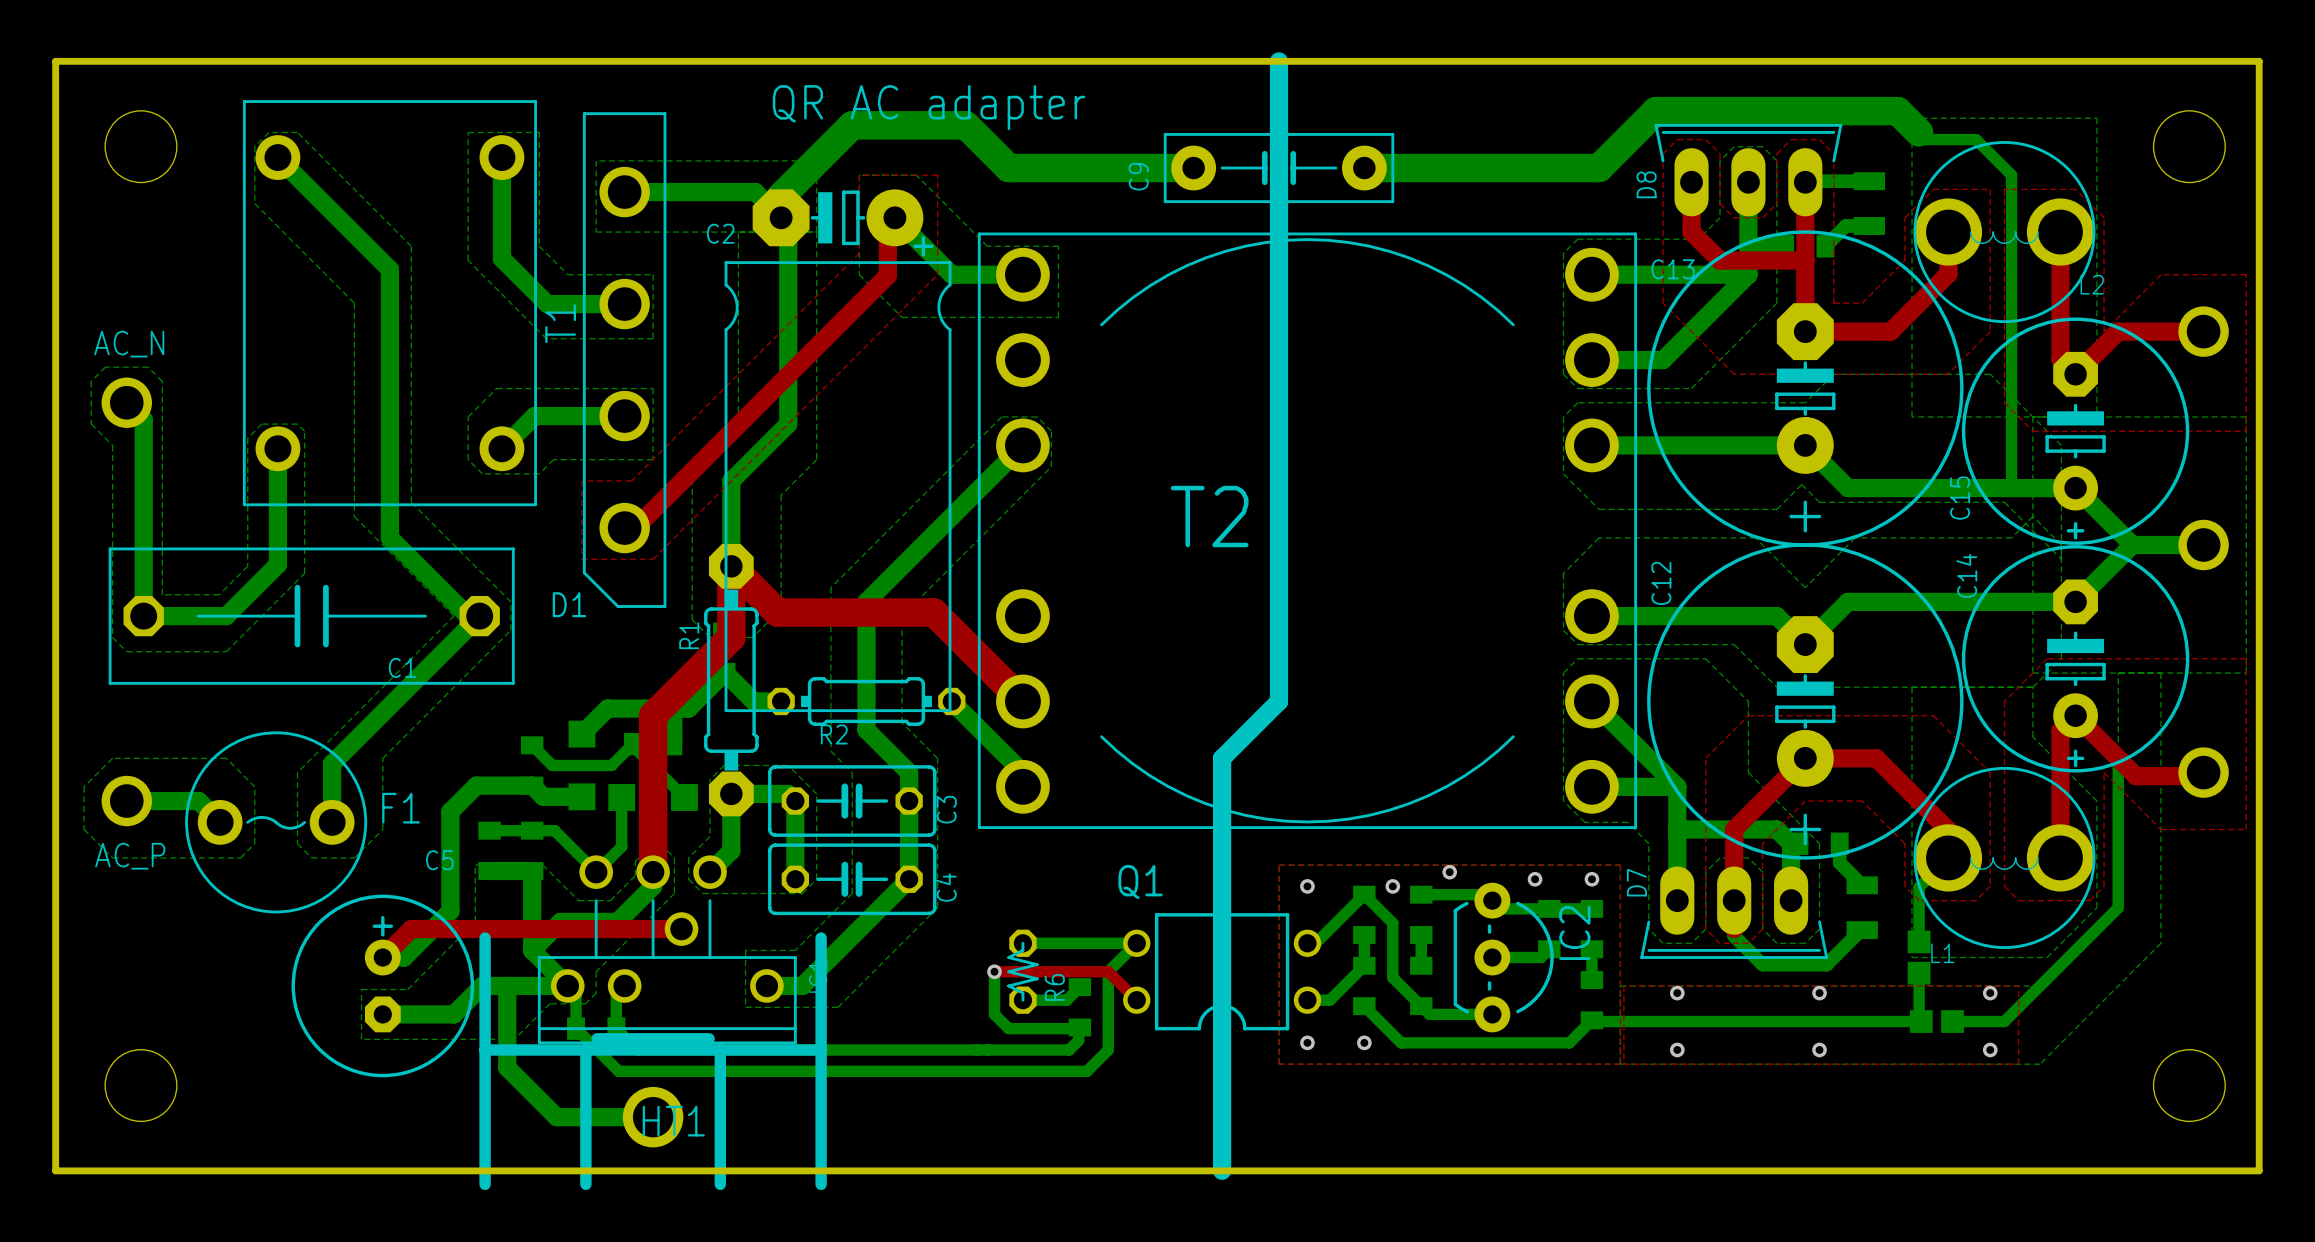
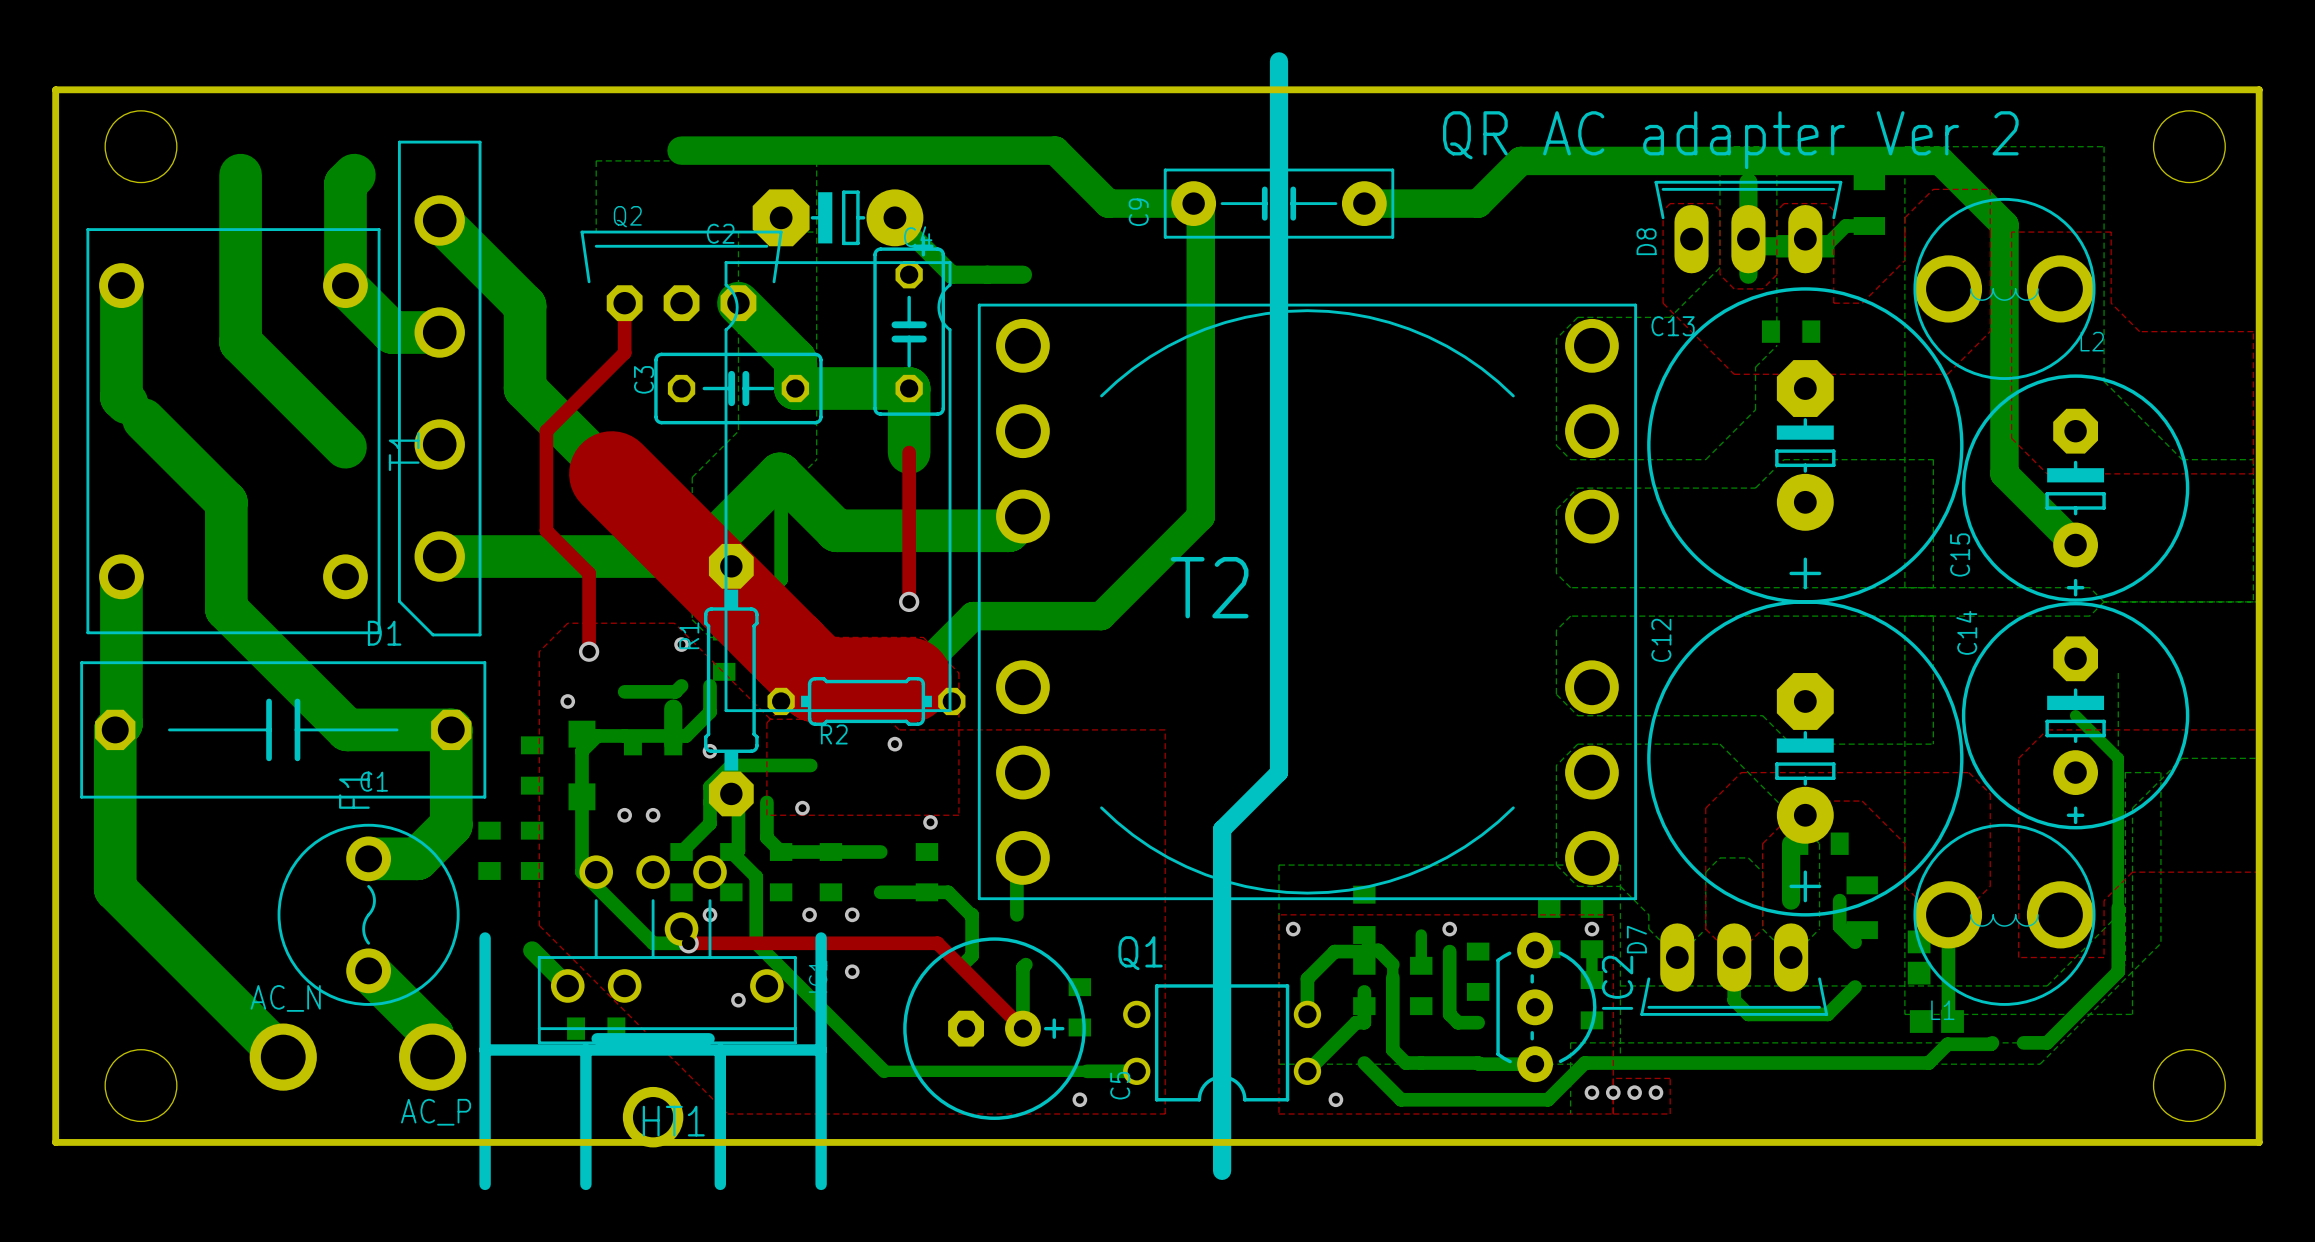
board edge: (55, 89) (55, 61) (2259, 61) (2259, 89) -> (55, 89) (2259, 89)
text: QR AC adapter (929, 107) -> none
bottom zone outline: (269, 132) (297, 132) (411, 246) (411, 502) (510, 601) (510, 630) (382, 758) (382, 829) (354, 857) (311, 857) (297, 843) (297, 772) (453, 616) (354, 516) (354, 303) (254, 203) (254, 146) (269, 132) -> none
bottom zone outline: (468, 132) (539, 132) (539, 246) (567, 274) (653, 274) (653, 338) (546, 338) (468, 260) (468, 132) -> none
text: none -> QR AC adapter Ver 2 (1730, 140)
bottom track: none -> (681, 150) (1055, 150) (1108, 203) (1193, 203) (1200, 210) (1200, 516) (1101, 616) (973, 616) (909, 680)
bottom track: (277, 157) (389, 269) (389, 537) (468, 616) (479, 616) (332, 763) (332, 822) -> none
bottom track: (501, 157) (501, 258) (547, 304) (624, 304) -> none
bottom track: (1193, 168) (1008, 168) (966, 125) (852, 125) (781, 196) (781, 217) -> none
C9 position: (1279, 168) -> (1279, 203)
bottom track: (1364, 168) (1599, 168) (1655, 111) (1897, 111) (1926, 139) (1976, 139) (2011, 175) (2011, 488) -> none
D8 position: (1748, 170) -> (1748, 227)
bottom track: none -> (240, 175) (240, 342) (345, 447)
bottom track: none -> (354, 175) (345, 184) (345, 285) (392, 332) (439, 332)
bottom zone outline: (859, 175) (916, 175) (987, 246) (1058, 246) (1058, 317) (902, 317) (859, 274) (859, 175) -> none
top zone outline: (859, 175) (859, 253) (631, 480) (581, 480) (581, 559) (653, 559) (937, 274) (937, 175) (859, 175) -> none
bottom track: (1869, 181) (1805, 182) -> none
top track: (1691, 182) (1691, 232) (1719, 260) (1805, 260) -> none
top track: (1805, 182) (1805, 331) (1890, 331) (1948, 273) (1948, 232) -> none
top zone outline: (2004, 189) (2075, 189) (2104, 217) (2104, 331) (2160, 274) (2246, 274) (2246, 431) (2032, 431) (2004, 402) (2004, 189) -> (2011, 232) (2011, 438) (2047, 473) (2253, 473) (2253, 331) (2139, 331) (2111, 303) (2111, 232) (2011, 232)
bottom track: (624, 192) (755, 192) (788, 224) (788, 424) (731, 480) (731, 624) (724, 631) -> none
bottom track: none -> (1364, 203) (1478, 203) (1520, 160) (1940, 160) (2004, 224) (2004, 473) (2075, 544)
top zone outline: (1663, 210) (1663, 153) (1677, 139) (1705, 139) (1719, 153) (1719, 203) (1734, 217) (1762, 217) (1776, 203) (1776, 153) (1791, 139) (1819, 139) (1833, 153) (1833, 210) -> (1663, 210) (1670, 203) (1712, 203) (1719, 210) (1719, 274) (1734, 288) (1762, 288) (1776, 274) (1776, 210) (1783, 203) (1826, 203) (1833, 210)
top track: (894, 217) (887, 224) (887, 275) (635, 528) (624, 528) -> none
bottom zone outline: (1719, 217) (1698, 239) (1577, 239) (1563, 253) (1563, 374) (1577, 388) (1691, 388) (1776, 303) -> (1719, 217) (1719, 267) (1670, 317) (1577, 317) (1556, 338) (1556, 445) (1570, 459) (1705, 459) (1755, 409) (1755, 367) (1776, 345) (1776, 303)
bottom track: none -> (439, 220) (525, 305) (525, 388) (611, 473)
L2 position: (2004, 232) -> (2004, 288)
top track: (2060, 232) (2060, 359) (2075, 374) (2118, 331) (2203, 331) -> none
bottom track: (1591, 274) (1748, 274) (1663, 360) (1591, 360) -> none
Q2: none -> (681, 275)
bottom track: none -> (121, 285) (121, 397) (126, 402)
T1 position: (389, 303) -> (233, 431)
top track: none -> (624, 303) (624, 352) (546, 431) (546, 530) (589, 573) (589, 651)
bottom track: none -> (738, 303) (795, 360) (795, 388) (909, 388) (909, 452)
part: none -> (1791, 331)
part: (2203, 331) -> none
D1 position: (624, 360) -> (439, 388)
bottom zone outline: (105, 367) (148, 367) (162, 381) (162, 594) (219, 594) (247, 566) (247, 438) (261, 424) (297, 424) (304, 431) (304, 573) (226, 651) (126, 651) (112, 637) (112, 445) (91, 424) (91, 381) (105, 367) -> none
bottom zone outline: (496, 388) (653, 388) (653, 459) (553, 459) (539, 473) (482, 473) (468, 459) (468, 416) (496, 388) -> none
C13 position: (1805, 388) -> (1805, 445)
part: AC_N (126, 402) -> none
bottom track: (624, 416) (534, 416) (501, 448) -> none
bottom zone outline: (1001, 416) (1037, 416) (1051, 431) (1051, 466) (902, 616) (902, 722) (937, 758) (937, 907) (838, 1007) (745, 1007) (745, 950) (795, 950) (852, 893) (852, 772) (830, 751) (830, 587) (1001, 416) -> none
bottom zone outline: (2032, 416) (2032, 673) (2246, 673) (2246, 416) (1912, 416) (1912, 118) (2096, 118) (2096, 416) -> none
bottom track: (143, 419) (143, 616) (226, 616) (277, 564) (277, 448) -> (143, 419) (226, 502) (226, 609) (347, 729) (451, 729) (451, 825) (417, 858) (368, 858)
C15 position: (2075, 431) -> (2075, 488)
bottom track: (1022, 445) (866, 601) (866, 729) (909, 772) (909, 879) (802, 985) (766, 985) -> none
bottom track: (1591, 445) (1805, 445) (1848, 488) (2075, 488) (2132, 544) -> none
top track: none -> (909, 452) (909, 601)
top track: none -> (611, 473) (818, 680) (909, 680)
bottom track: none -> (779, 473) (697, 556) (439, 556)
bottom track: none -> (779, 473) (836, 530) (1008, 530) (1022, 516)
bottom track: none -> (779, 473) (781, 579) (774, 586) (766, 586)
T2 position: (1307, 530) -> (1307, 601)
bottom zone outline: (2061, 544) (2032, 516) (2011, 537) (1855, 537) (1805, 587) (1755, 537) (1599, 537) (1563, 573) (1563, 630) (1577, 644) (1734, 644) (1776, 687) (2032, 687) -> none
bottom track: (2132, 544) (2203, 544) -> none
bottom track: (2132, 544) (2075, 601) (1848, 601) (1805, 644) (1776, 616) (1591, 616) -> none
part: (2203, 544) -> none
bottom zone outline: (2061, 559) (2004, 502) (1819, 502) (1801, 484) (1776, 509) (1599, 509) (1563, 473) (1563, 416) (1577, 402) (1805, 402) (1833, 374) (1990, 374) (2061, 445) (2061, 658) (2032, 687) -> none
bottom track: none -> (121, 576) (121, 723) (115, 729) (115, 889) (283, 1057)
bottom zone outline: none -> (1904, 587) (1904, 146) (2104, 146) (2104, 381) (2182, 459) (2253, 459) (2253, 601)
bottom zone outline: none -> (1933, 587) (1933, 459) (1783, 459) (1755, 488) (1577, 488) (1556, 509) (1556, 573) (1570, 587) (2089, 587) (2104, 601)
via: none -> (909, 601)
bottom zone outline: none -> (2104, 601) (2260, 601) (2260, 758) (2182, 758) (2132, 808) (2132, 1014) (1904, 1014) (1904, 616)
bottom zone outline: none -> (2104, 601) (2089, 616) (1570, 616) (1556, 630) (1556, 694) (1577, 715) (1762, 715) (1791, 744) (1933, 744) (1933, 616)
C1 position: (311, 616) -> (283, 729)
top zone outline: none -> (567, 623) (674, 623) (770, 719) (888, 719) (899, 729) (1165, 729) (1165, 1113) (727, 1113) (539, 925) (539, 651) (567, 623)
top zone outline: none -> (823, 637) (795, 665) (795, 694) (766, 722) (766, 815) (958, 815) (958, 673) (923, 637) (823, 637)
via: none -> (681, 644)
via: none -> (589, 651)
top zone outline: (2047, 658) (2246, 658) (2246, 829) (2160, 829) (2104, 772) (2104, 886) (2089, 900) (2018, 900) (2004, 886) (2004, 701) (2047, 658) -> (2047, 729) (2018, 758) (2018, 957) (2104, 957) (2104, 900) (2132, 872) (2260, 872) (2260, 729) (2047, 729)
C14 position: (2075, 658) -> (2075, 715)
bottom zone outline: (2160, 673) (2160, 772) -> (1570, 1113) (1570, 1042) (2047, 1042) (2125, 964) (2125, 772) (2160, 772)
bottom track: none -> (681, 685) (675, 691) (624, 691)
bottom track: none -> (710, 685) (710, 712) (686, 735) (597, 735) (581, 751) (581, 872) (653, 943) (688, 943)
bottom zone outline: (1912, 687) (1912, 957) (2047, 957) (2096, 907) (2096, 801) (2032, 737) (2032, 687) -> none
via: none -> (567, 701)
bottom track: (781, 701) (753, 701) (724, 671) (688, 708) (607, 708) (581, 734) -> none
bottom track: (951, 701) (1022, 772) (1022, 786) -> none
top track: (1022, 701) (934, 612) (777, 612) (731, 566) (731, 637) (653, 715) (653, 872) -> none
line: (1279, 701) (1222, 758) (1222, 829) -> (1279, 701) (1279, 772) (1222, 829)
bottom track: (1591, 701) (1677, 786) -> none
C12 position: (1805, 701) -> (1805, 758)
via: none -> (894, 744)
bottom track: (532, 745) (552, 765) (611, 765) (632, 744) (684, 797) -> none
via: none -> (710, 751)
bottom zone outline: (112, 758) (226, 758) (254, 786) (254, 843) (240, 857) (112, 857) (84, 829) (84, 786) (112, 758) -> none
bottom zone outline: (724, 765) (788, 765) (816, 793) (816, 879) (802, 893) (702, 893) (688, 879) (688, 857) (710, 836) (710, 779) (724, 765) -> none
bottom track: none -> (810, 765) (731, 765) (710, 786) (710, 823) (681, 852)
bottom zone outline: (1748, 772) (1748, 701) (1705, 658) (1577, 658) (1563, 673) (1563, 801) (1584, 822) (1627, 822) (1648, 843) (1648, 914) -> (1748, 772) (1719, 744) (1577, 744) (1556, 765) (1556, 865) (1577, 886) (1620, 886) (1648, 914)
top track: (2203, 772) (2200, 776) (2136, 776) (2075, 715) (2060, 730) (2060, 857) -> none
part: (2203, 772) -> none
bottom track: (1591, 786) (1677, 786) -> none
bottom track: (1677, 786) (1677, 900) -> none
top zone outline: (1990, 793) (1990, 772) (1933, 715) (1748, 715) (1705, 758) (1705, 808) -> (1990, 793) (1968, 772) (1741, 772) (1705, 808)
bottom track: (581, 796) (543, 796) (532, 785) (476, 785) (450, 811) (450, 911) (404, 957) (382, 957) -> none
bottom track: (621, 797) (621, 846) (596, 872) (554, 830) (489, 830) -> none
part: (653, 797) -> none
bottom track: (126, 801) (198, 801) (220, 822) -> none
part: AC_P (126, 801) -> none
C3 rotation: 0° (852, 801) -> 180° (738, 388)
C3 position: (852, 801) -> (738, 388)
bottom track: none -> (766, 802) (766, 837) (781, 852) (880, 852)
via: none -> (802, 808)
via: none -> (624, 815)
via: none -> (653, 815)
F1 rotation: 0° (276, 822) -> 90° counterclockwise (368, 914)
F1 position: (276, 822) -> (368, 914)
via: none -> (930, 822)
bottom track: (1677, 829) (1776, 829) (1791, 843) (1799, 843) -> none
bottom track: (1839, 843) (1839, 862) (1862, 885) -> none
bottom zone outline: (645, 850) (635, 861) (635, 875) (610, 900) (578, 900) (542, 865) (475, 865) (475, 921) (407, 989) (361, 989) (361, 1039) (514, 1039) (549, 1003) (585, 1003) (596, 993) (596, 971) (674, 893) (674, 857) (667, 850) (645, 850) -> none
bottom track: none -> (1022, 857) (1016, 863) (1016, 914)
bottom track: (1948, 857) (1919, 887) (1919, 941) -> none
top track: (1948, 857) (1948, 830) (1876, 758) (1805, 758) (1734, 829) (1734, 929) -> none
L1 position: (2004, 857) -> (2004, 914)
bottom track: (489, 870) (532, 870) (532, 950) (560, 921) (617, 921) (653, 886) (653, 872) -> none
part: none -> (681, 872)
bottom track: (710, 872) (731, 850) (731, 793) (788, 793) (795, 801) (795, 879) -> none
part: none -> (731, 872)
part: none -> (781, 872)
part: none -> (830, 872)
part: none -> (926, 872)
via: (1449, 872) -> none
C4 rotation: 0° (852, 879) -> 90° counterclockwise (909, 331)
C4 position: (852, 879) -> (909, 331)
via: (1535, 879) -> none
via: (1591, 879) -> none
via position: (1307, 886) -> (1293, 929)
via: (1392, 886) -> none
bottom track: none -> (880, 892) (948, 892) (972, 914) (972, 955) (963, 964)
bottom track: (1421, 894) (1486, 894) (1500, 908) (1591, 908) -> none
bottom track: (1734, 900) (1734, 936) (1762, 964) (1826, 964) (1862, 930) -> none
bottom track: none -> (1839, 900) (1839, 926) (1855, 942)
bottom track: (2118, 907) (2004, 1021) (1952, 1021) -> (2118, 907) (2118, 971) (2047, 1042) (2023, 1042)
D7 position: (1734, 912) -> (1734, 969)
via: none -> (710, 914)
via: none -> (809, 914)
via: none -> (852, 914)
top zone outline: (1279, 914) (1279, 865) (1620, 865) (1620, 1064) (1279, 1064) -> (1279, 914) (1613, 914) (1613, 1113)
part position: (1421, 914) -> (1478, 971)
bottom track: none -> (1948, 914) (1947, 1013)
top track: (681, 929) (411, 929) (382, 957) -> none
via: none -> (1449, 929)
via: none -> (1591, 929)
bottom track: (1364, 935) (1364, 965) (1329, 1000) (1307, 1000) -> none
top track: none -> (688, 943) (937, 943) (1022, 1028)
via: none -> (688, 943)
bottom track: (1022, 943) (1136, 943) (1108, 971) (1108, 1049) (1086, 1071) -> (1136, 1071) (1086, 1071)
bottom track: (1307, 943) (1315, 943) (1364, 894) (1392, 923) (1392, 964) -> (1307, 1014) (1307, 978) (1334, 951) (1378, 950) (1392, 964)
bottom track: (1549, 949) (1540, 957) (1492, 957) -> none
bottom track: none -> (1449, 951) (1449, 1014) (1457, 1022) (1478, 1022)
IC2 position: (1503, 957) -> (1546, 1007)
bottom track: none -> (1734, 957) (1734, 1000) (1748, 1014) (1827, 1014) (1855, 987)
bottom track: none -> (1025, 964) (1022, 967) (1022, 1028)
bottom track: none -> (368, 970) (432, 1034) (432, 1057)
via: none -> (852, 971)
bottom track: (994, 971) (994, 1014) (1008, 1028) (1078, 1028) -> none
top track: (994, 971) (1108, 971) (1136, 1000) -> none
via: (994, 971) -> none
R6: (1022, 971) -> none
Q1 position: (1222, 971) -> (1222, 1042)
bottom track: (1919, 973) (1919, 1019) (1921, 1021) (1591, 1020) (1569, 1042) (1401, 1042) (1364, 1006) -> none
bottom track: (1392, 977) (1429, 1014) (1492, 1014) -> (1392, 977) (1392, 1049) (1405, 1063) (1535, 1064)
C5 rotation: 0° (382, 985) -> 90° clockwise (994, 1028)
C5 position: (382, 985) -> (994, 1028)
bottom track: (507, 985) (507, 1067) (556, 1117) (653, 1117) -> none
bottom track: (624, 985) (616, 992) (616, 1028) (637, 1049) (1069, 1049) (1078, 1040) (1078, 1028) -> none
top zone outline: (1623, 985) (1623, 1064) (2018, 1064) (2018, 985) (1623, 985) -> none
bottom track: (1079, 987) (1066, 1000) (1022, 1000) -> none
bottom track: none -> (1364, 991) (1364, 1022) (1356, 1022) (1307, 1071)
via: (1677, 993) -> none
via: (1819, 993) -> none
via: (1990, 993) -> none
via: none -> (738, 1000)
bottom track: (382, 1014) (453, 1014) (482, 985) (567, 985) (576, 994) (576, 1028) (618, 1071) (884, 1071) -> (738, 802) (738, 850) (731, 852) (756, 876) (756, 943) (884, 1071)
via: (1307, 1042) -> none
via: (1364, 1042) -> none
bottom track: none -> (1992, 1042) (1947, 1044) (1928, 1063) (1584, 1063) (1548, 1099) (1401, 1099) (1364, 1063)
via: (1677, 1049) -> none
via: (1819, 1049) -> none
via: (1990, 1049) -> none
part: none -> AC_N (283, 1057)
part: none -> AC_P (432, 1057)
top zone outline: none -> (1279, 1064) (1279, 1113) (1670, 1113) (1670, 1078) (1613, 1078)
via: none -> (1591, 1092)
via: none -> (1613, 1092)
via: none -> (1634, 1092)
via: none -> (1655, 1092)
via: none -> (1079, 1099)
via: none -> (1335, 1099)
board edge: (55, 1142) (55, 1170) (2259, 1170) (2259, 1142) -> (55, 1142) (2259, 1142)

